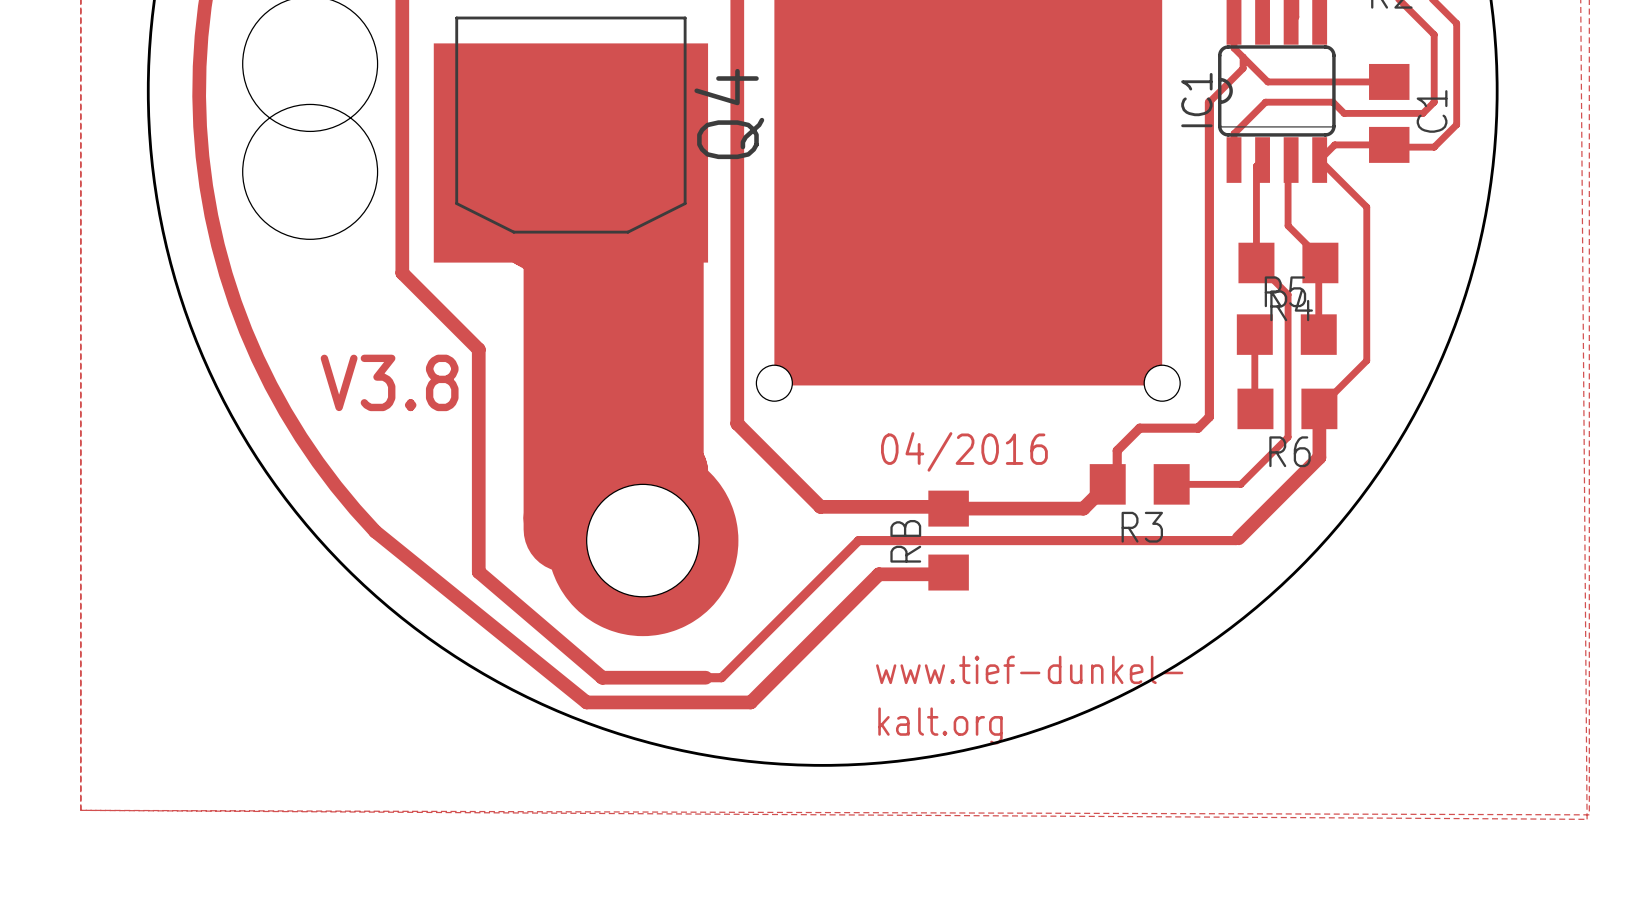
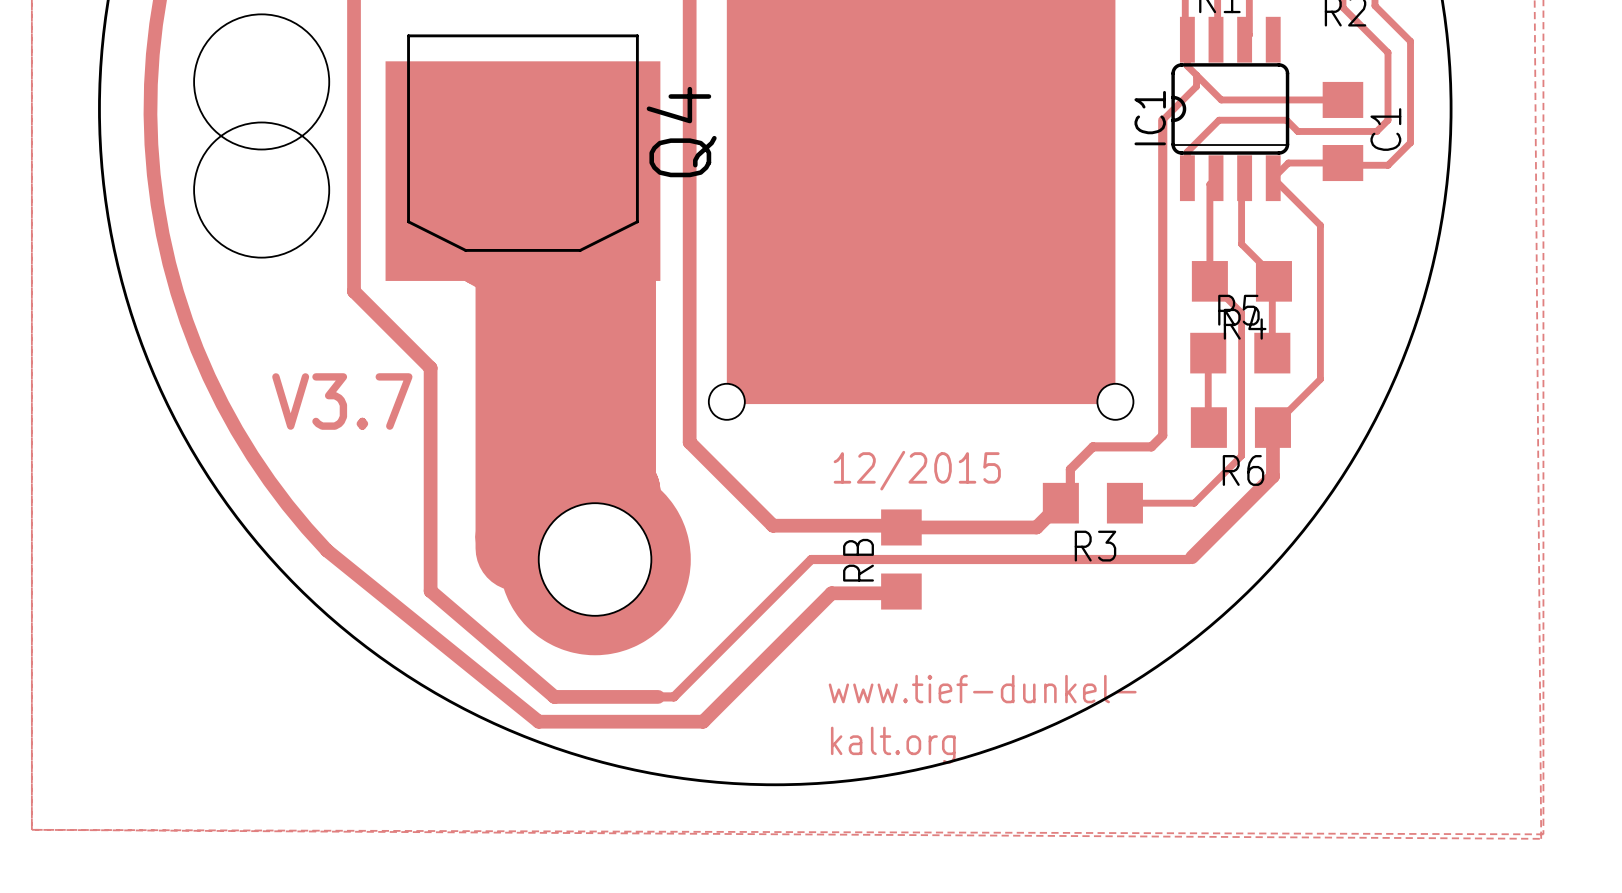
text: V3.8 (389, 382) -> V3.7 (342, 401)
text: 04/2016 (964, 451) -> 12/2015 (917, 470)

